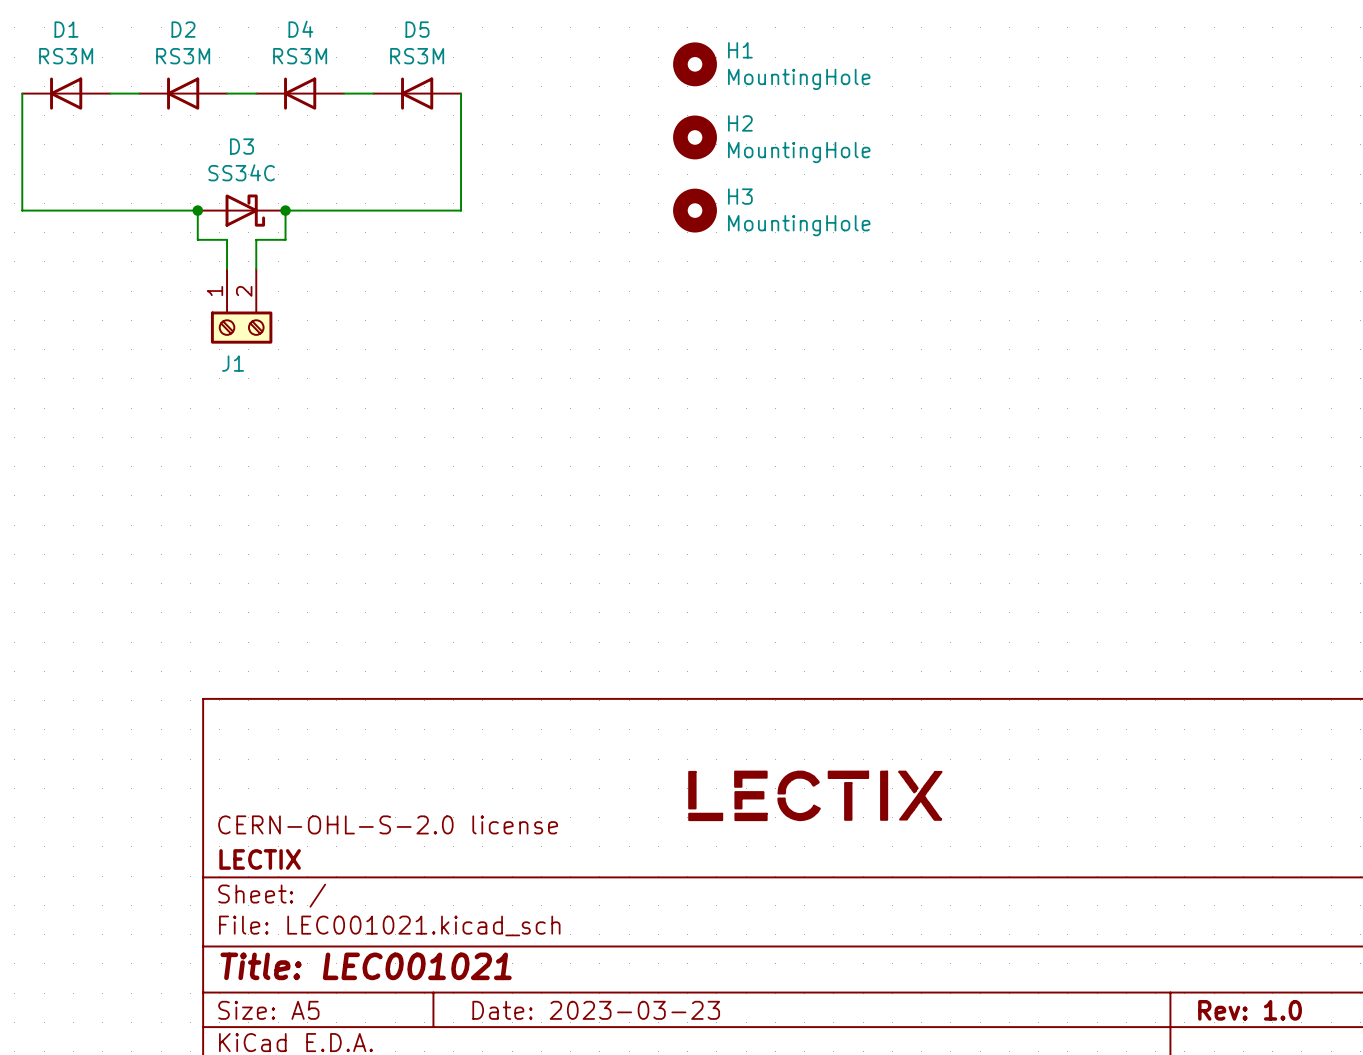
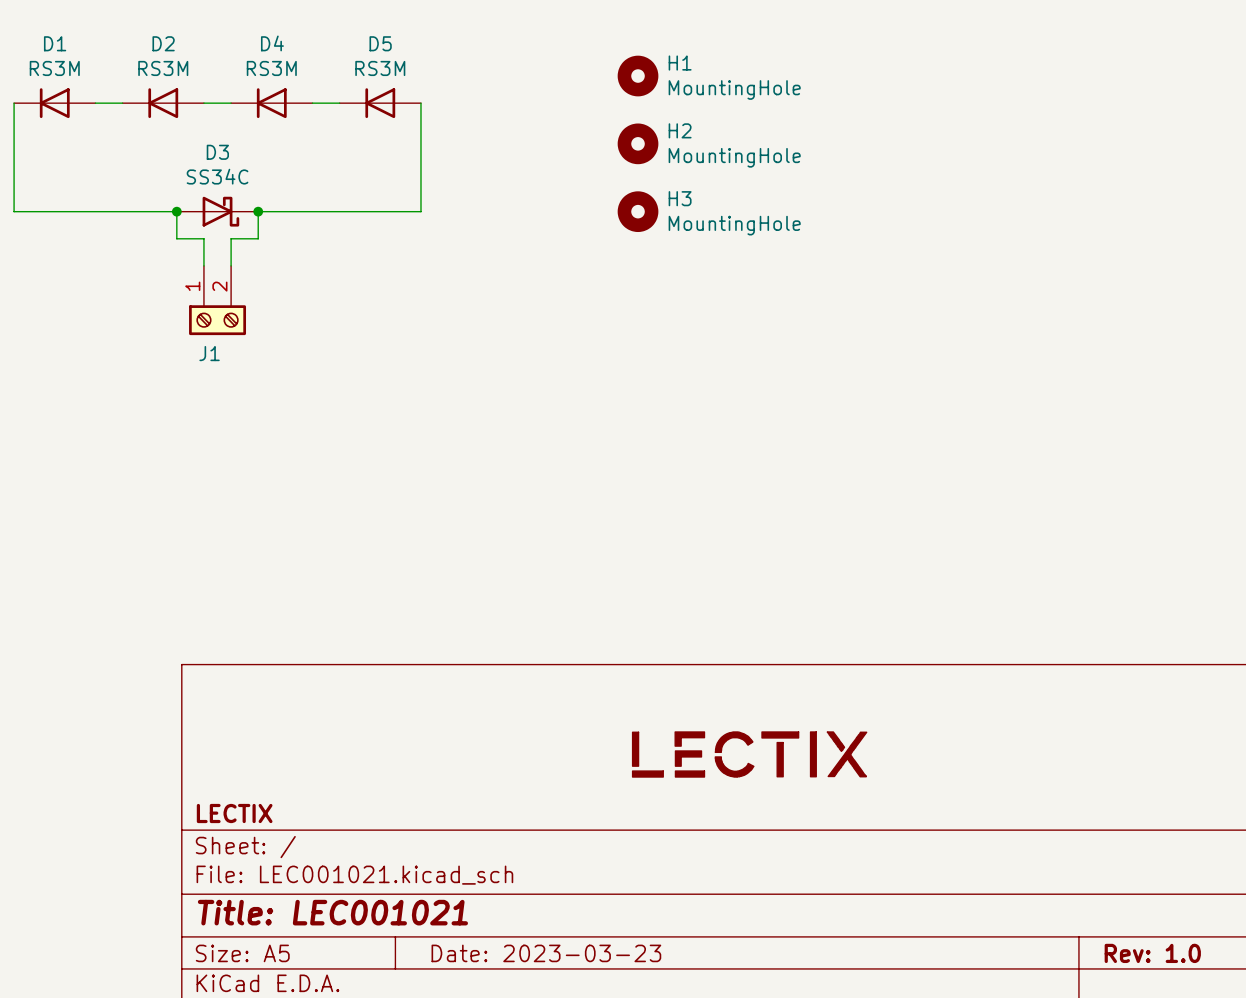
title block: CERN-OHL-S-2.0 license (388, 824) -> none

